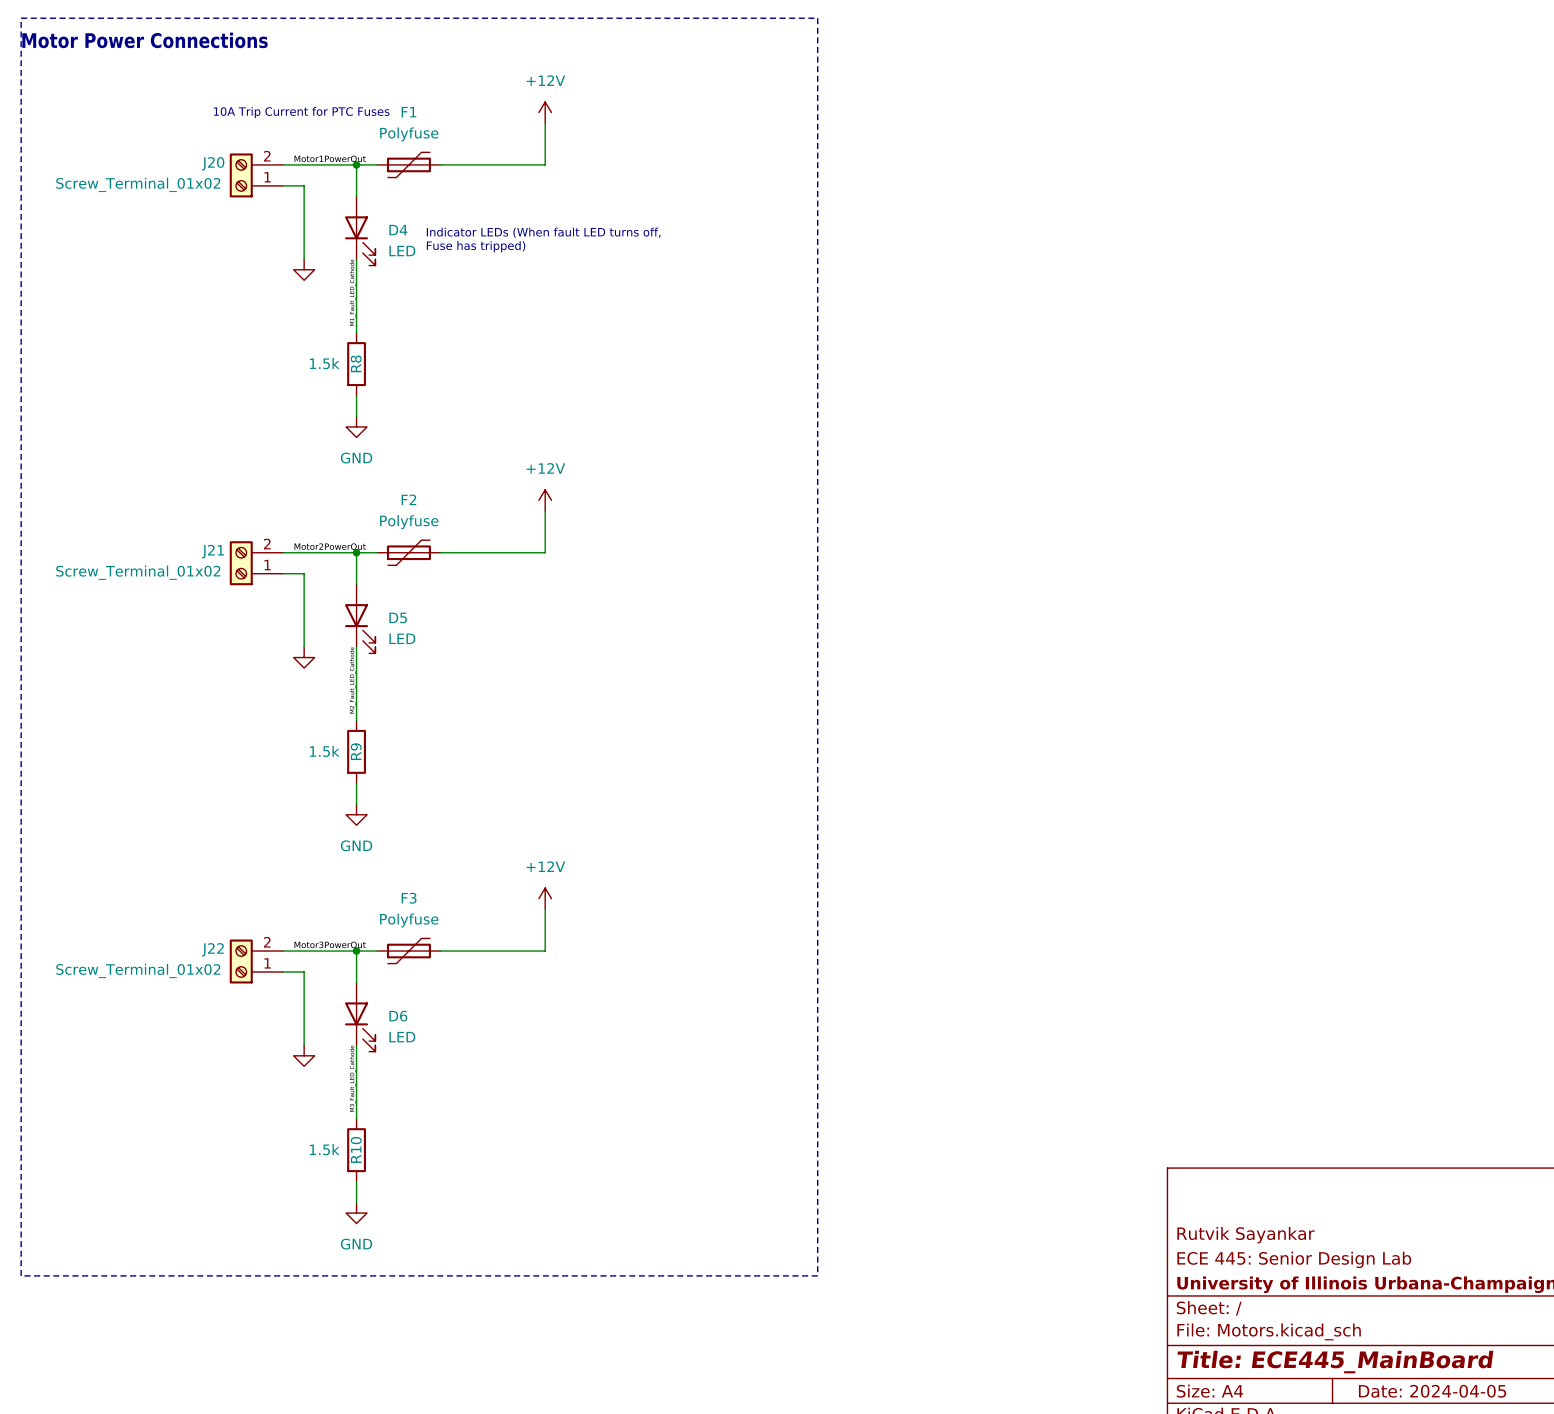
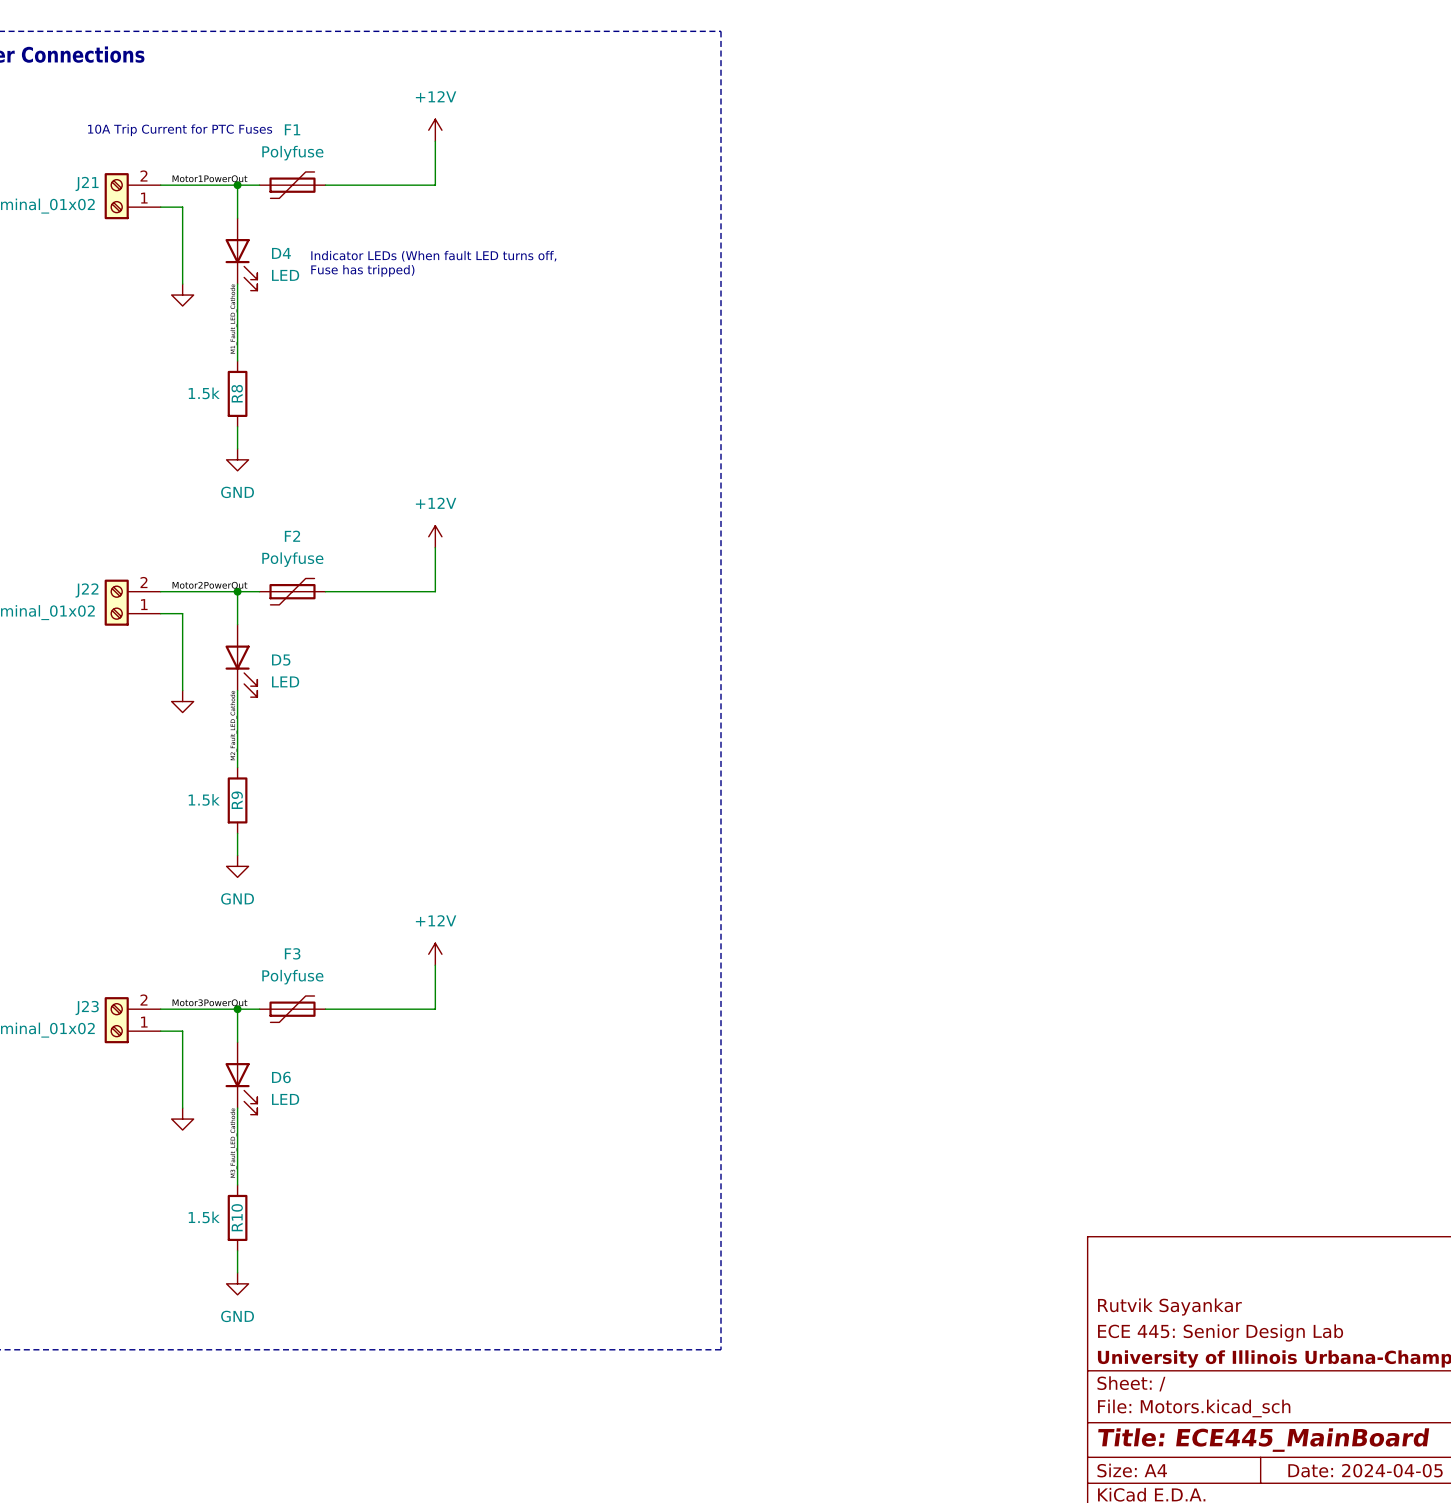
J20 name: J20 (213, 163) -> J21 (87, 183)
J21 name: J21 (212, 551) -> J22 (87, 590)
J22 name: J22 (212, 949) -> J23 (87, 1007)

